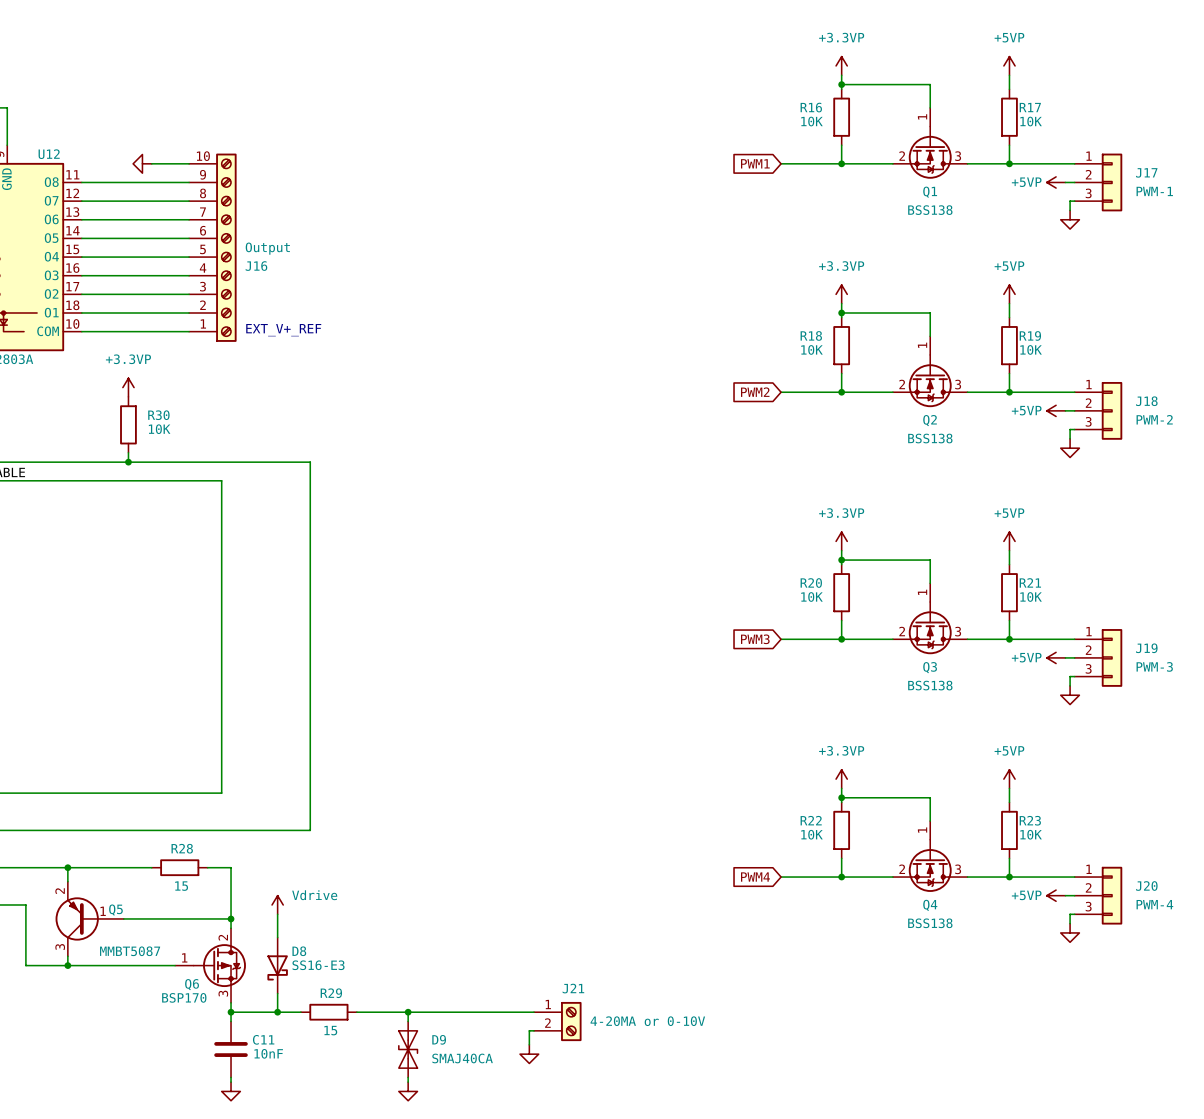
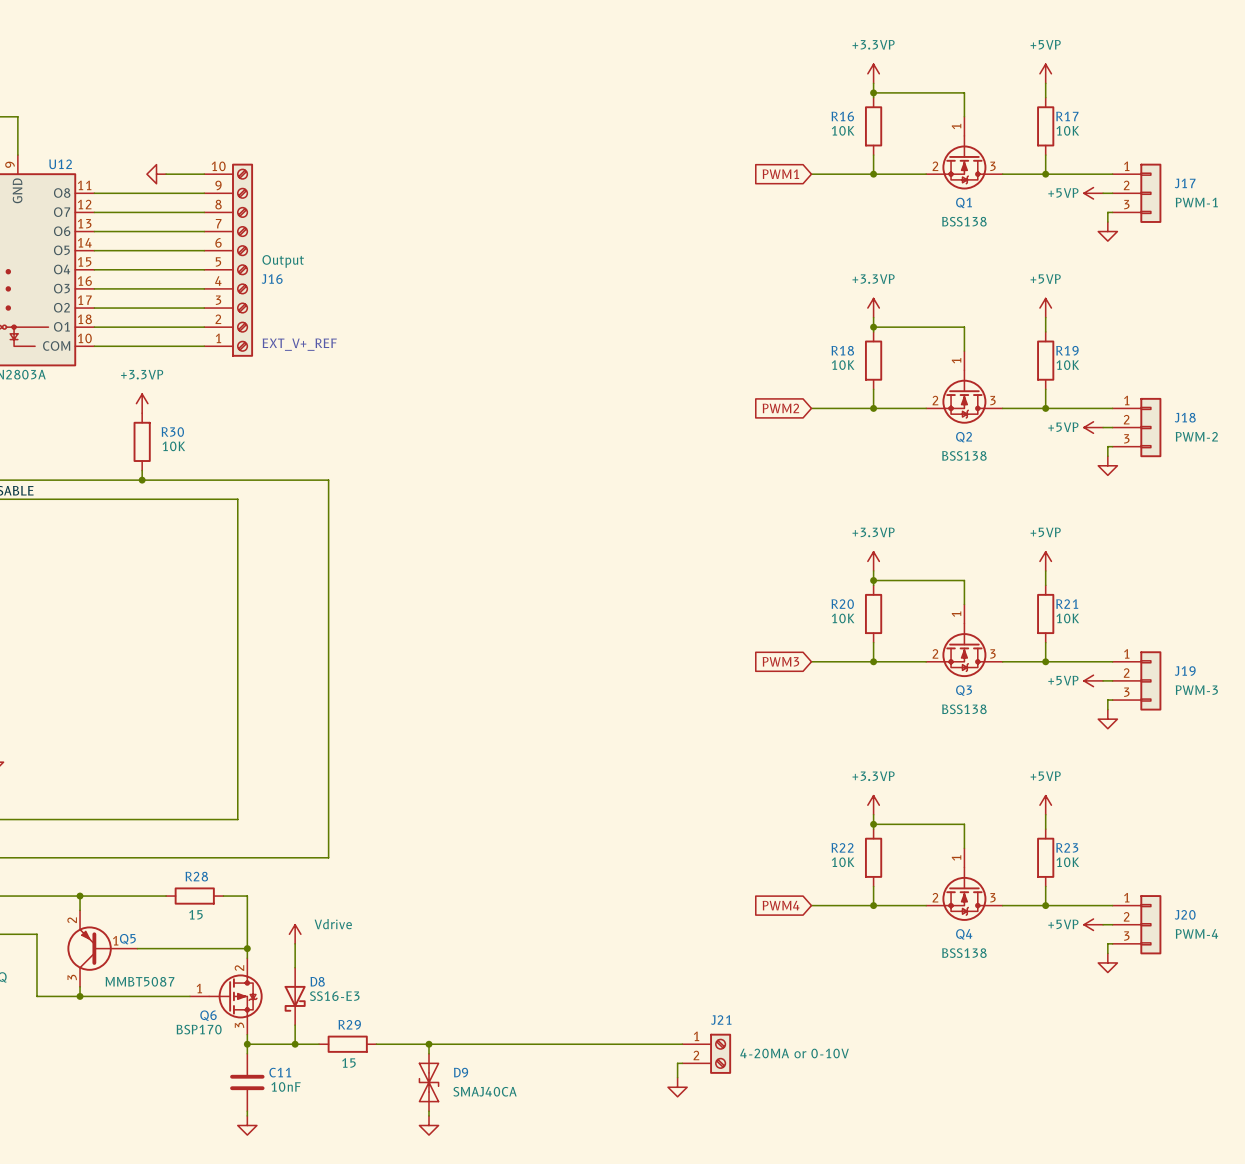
wire: none -> (558, 1044) (682, 1044)
J21 position: (557, 1021) -> (706, 1053)
wire: (534, 1030) (529, 1030) (529, 1044) -> (682, 1063) (677, 1063) (677, 1077)
power symbol position: (529, 1054) -> (677, 1087)

